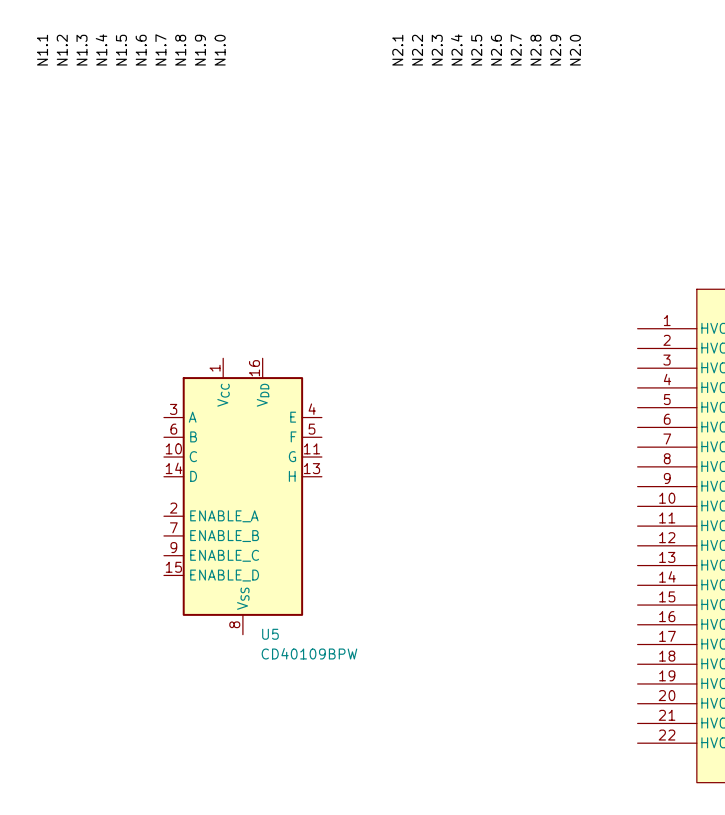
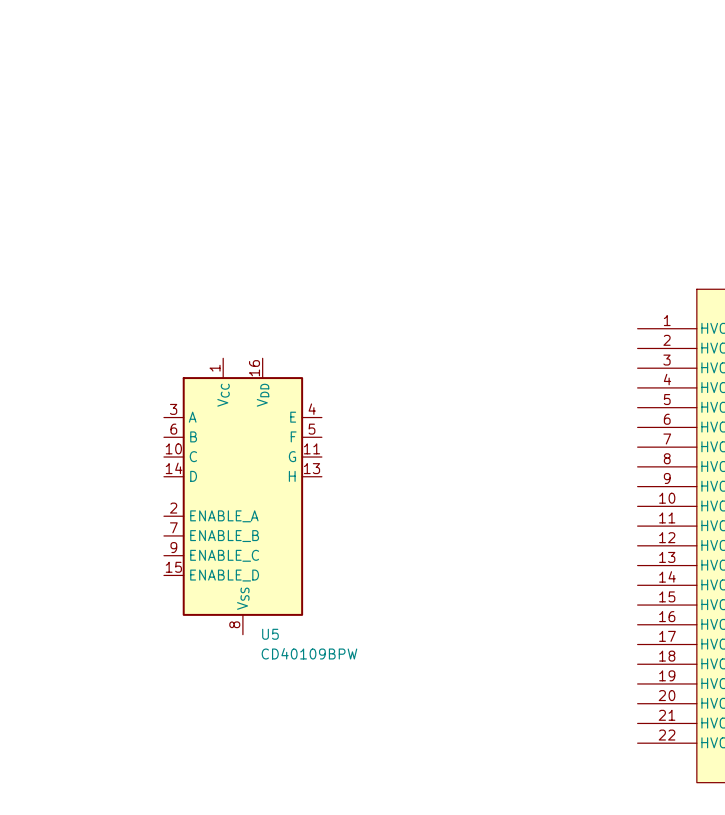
label: N1.4 (101, 49) -> none
label: N1.7 (160, 49) -> none
label: N2.4 (456, 49) -> none
label: N2.7 (516, 49) -> none
label: N1.1 (42, 50) -> none
label: N1.2 (62, 50) -> none
label: N1.3 (82, 50) -> none
label: N1.5 (121, 50) -> none
label: N1.6 (141, 50) -> none
label: N1.8 (180, 50) -> none
label: N1.9 (200, 50) -> none
label: N1.0 (220, 50) -> none
label: N2.1 (397, 50) -> none
label: N2.2 (417, 50) -> none
label: N2.3 (437, 50) -> none
label: N2.5 (476, 50) -> none
label: N2.6 (496, 50) -> none
label: N2.8 (535, 50) -> none
label: N2.9 (555, 50) -> none
label: N2.0 (575, 50) -> none

